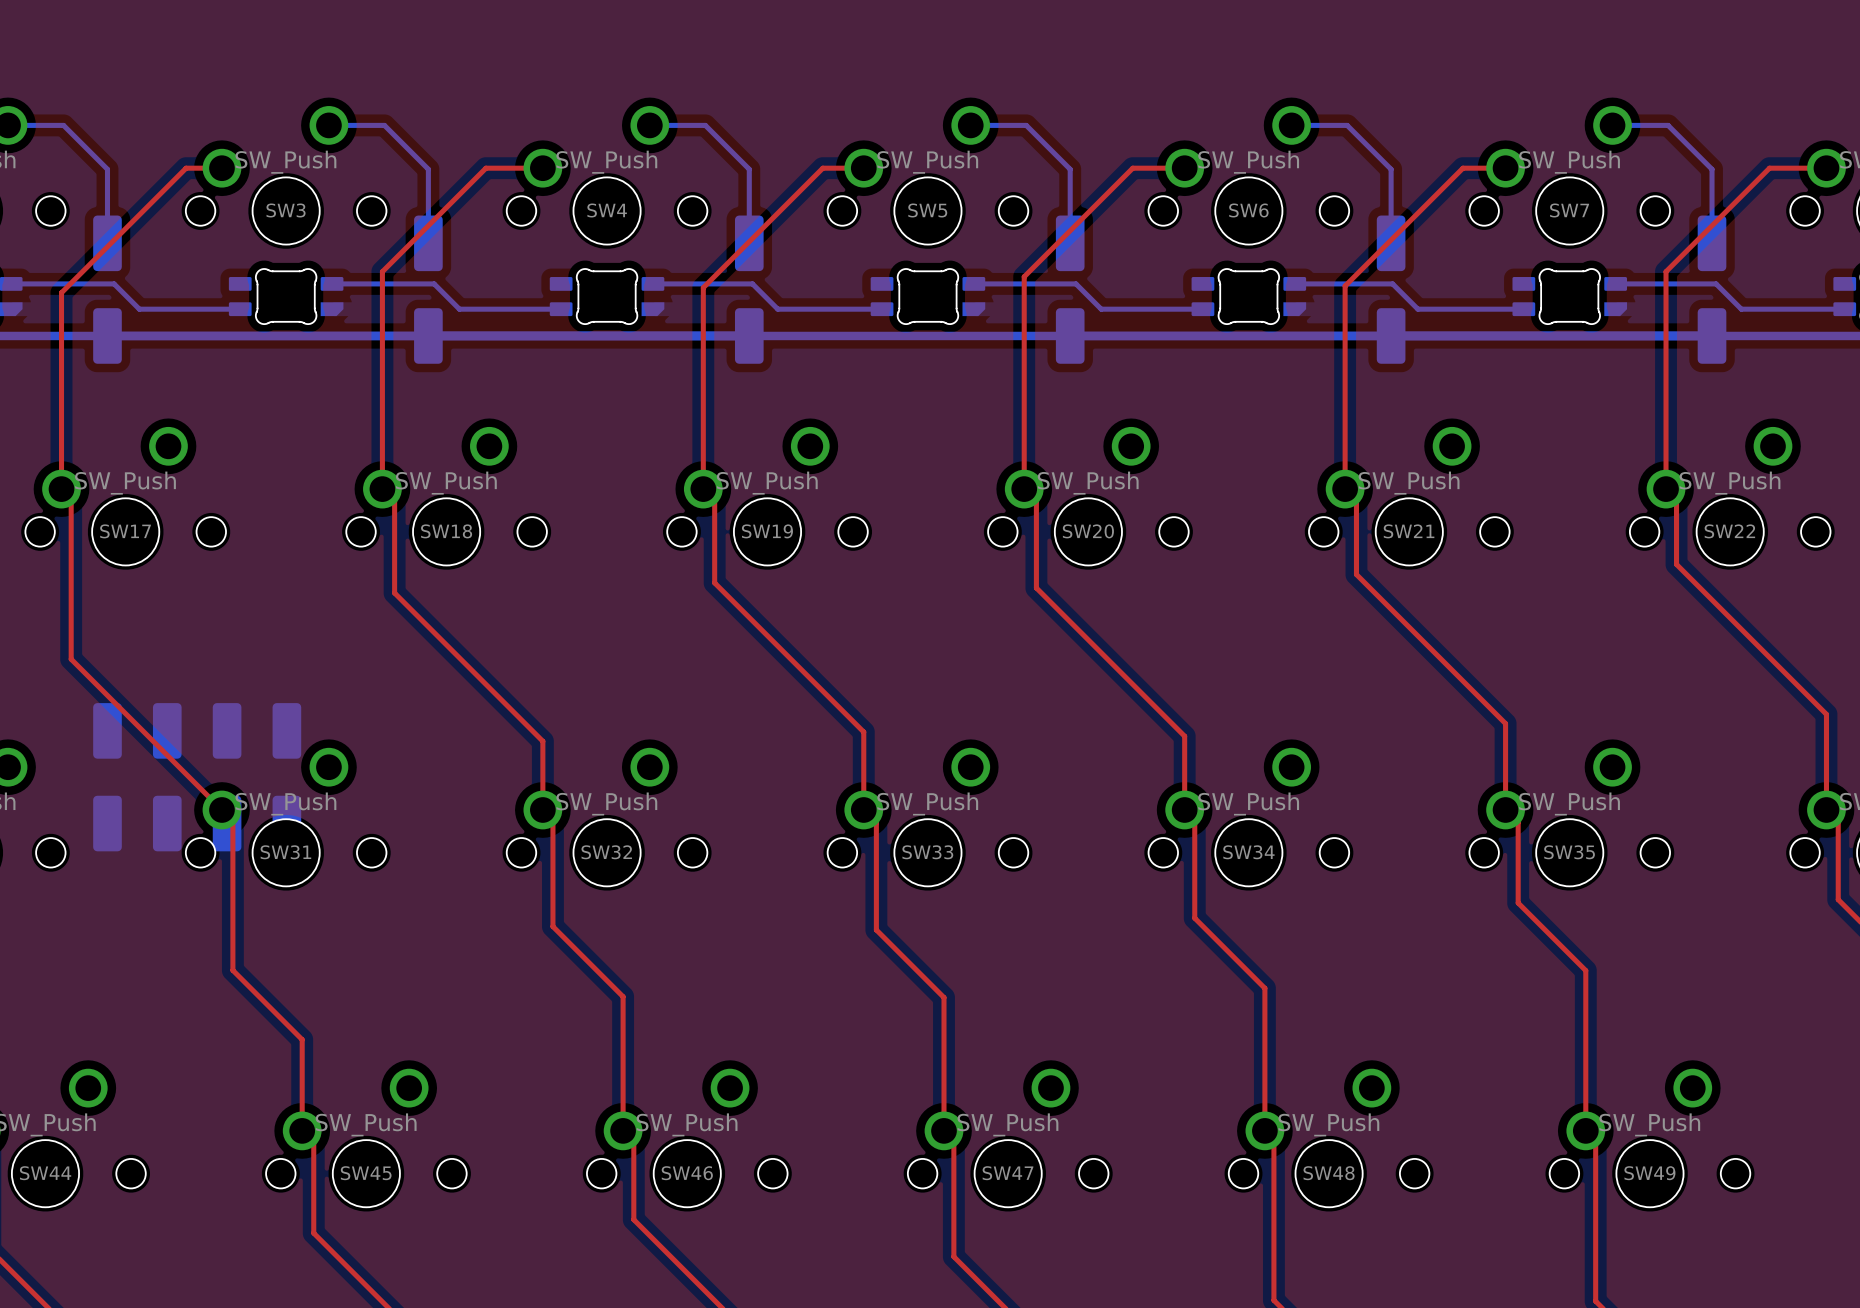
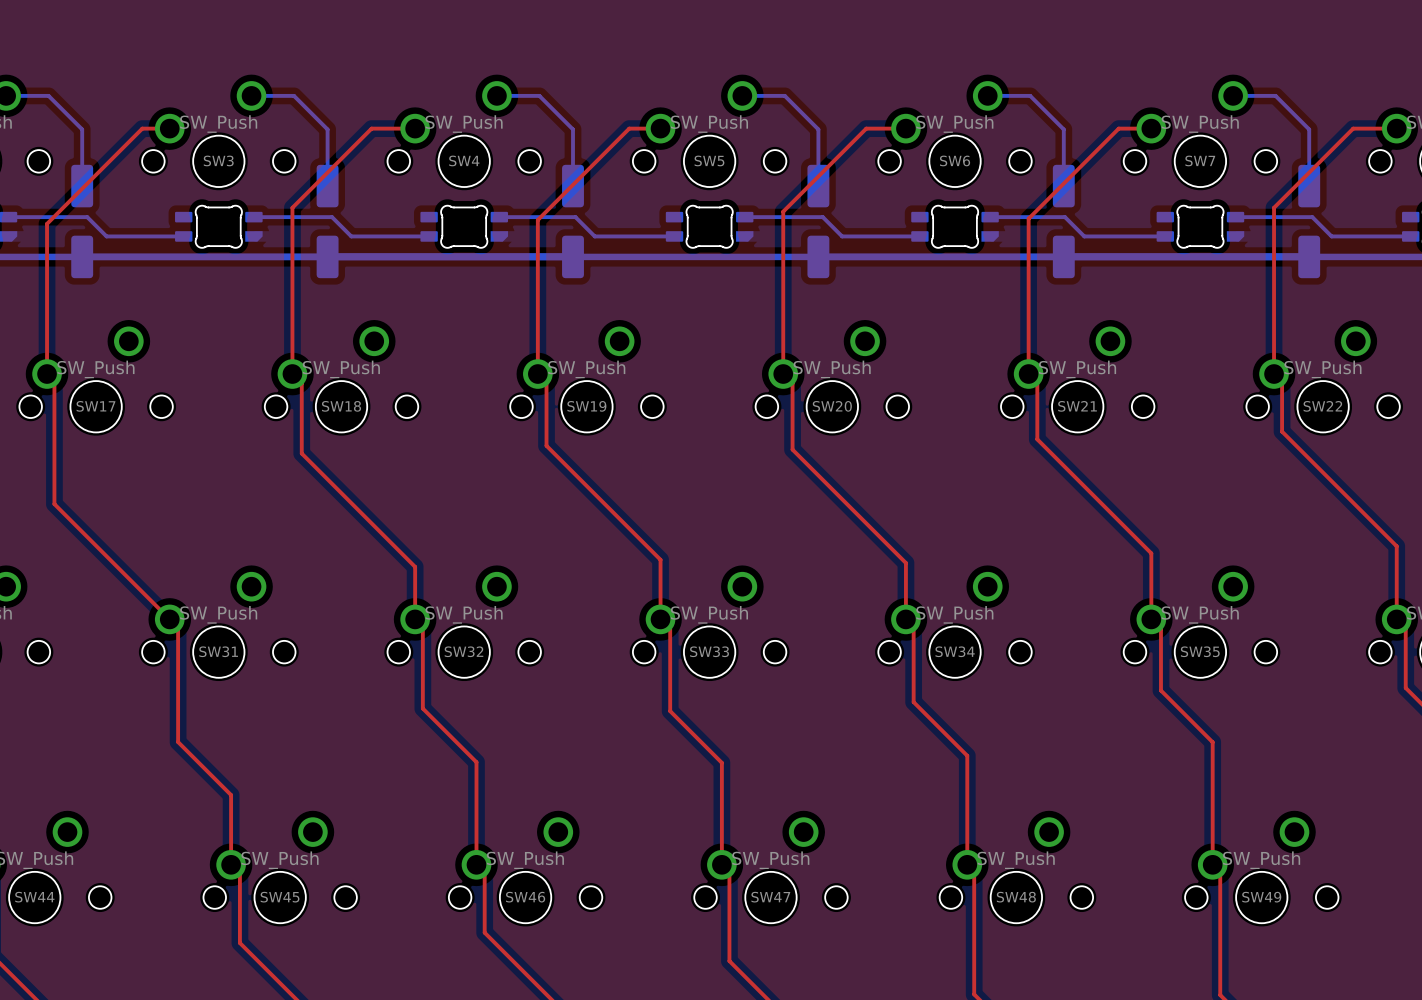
part: (107, 777) -> none
part: (167, 777) -> none
part: (227, 777) -> none
part: (286, 777) -> none

